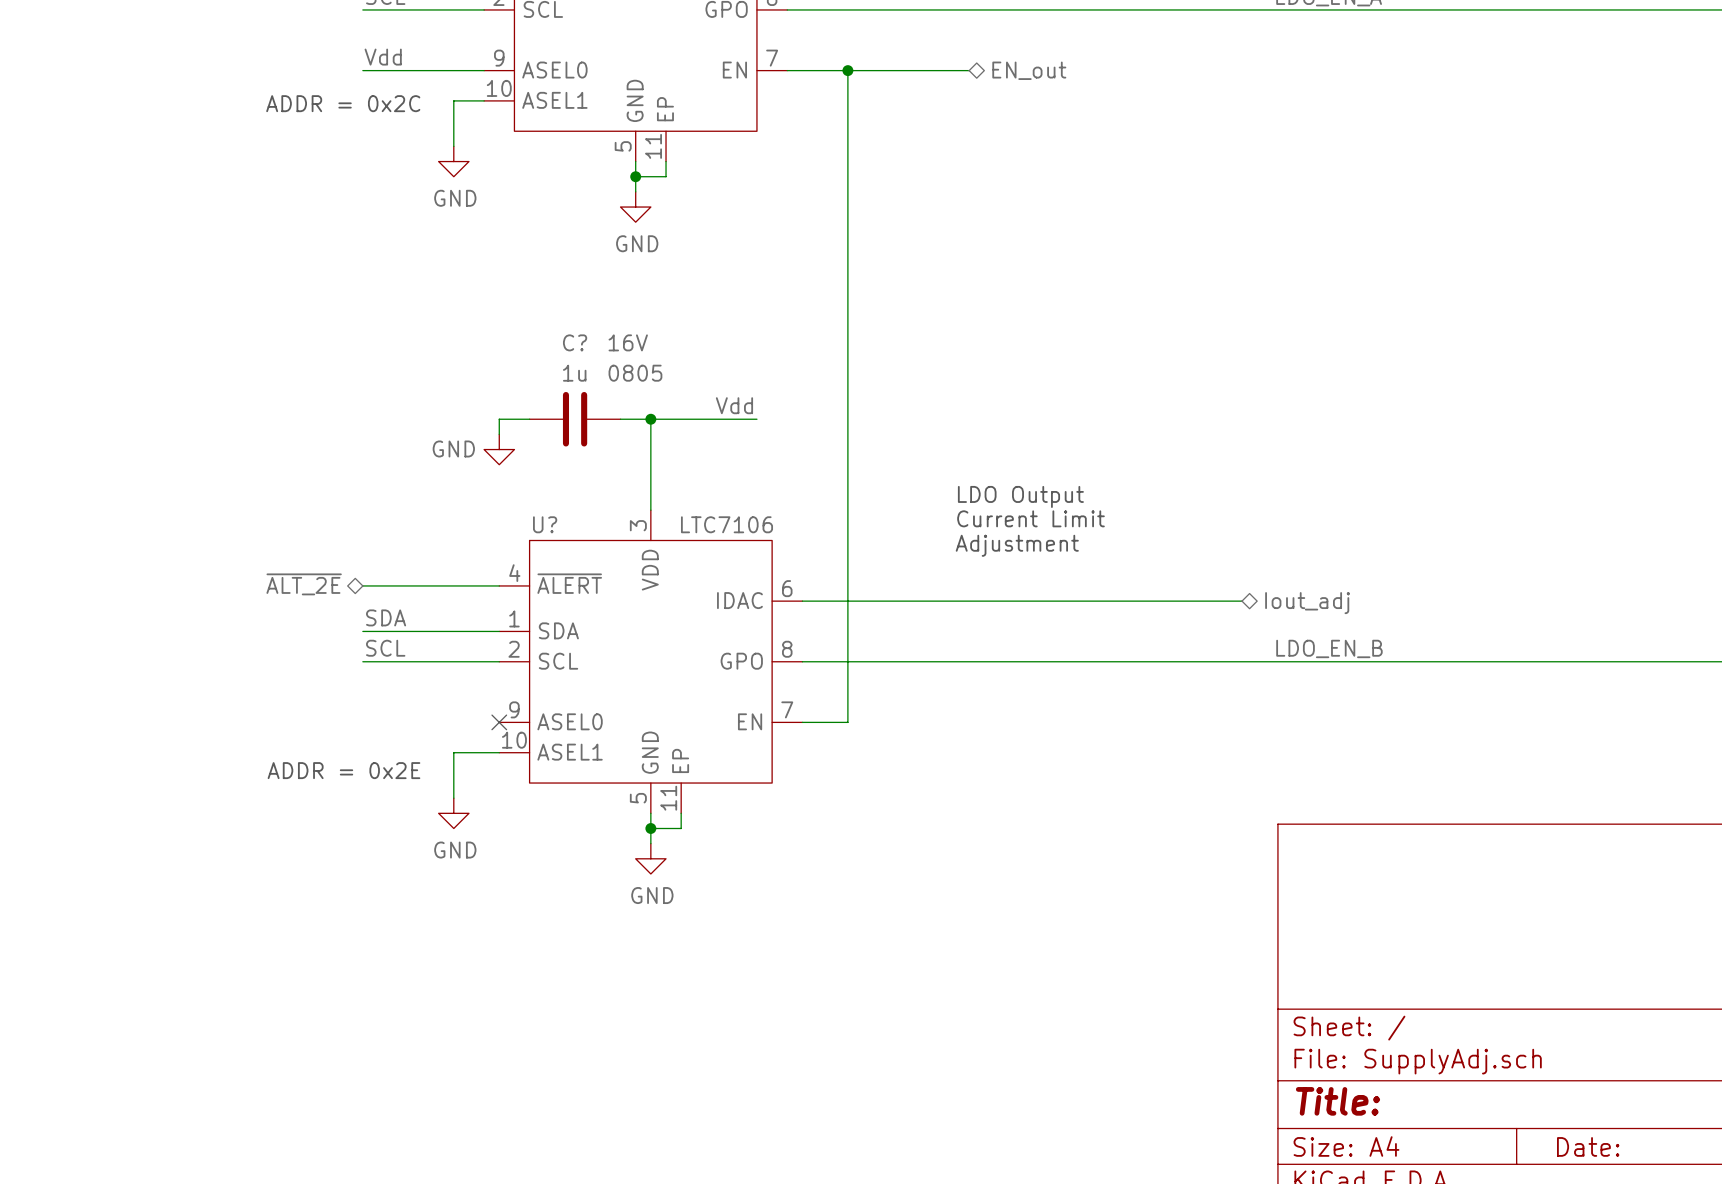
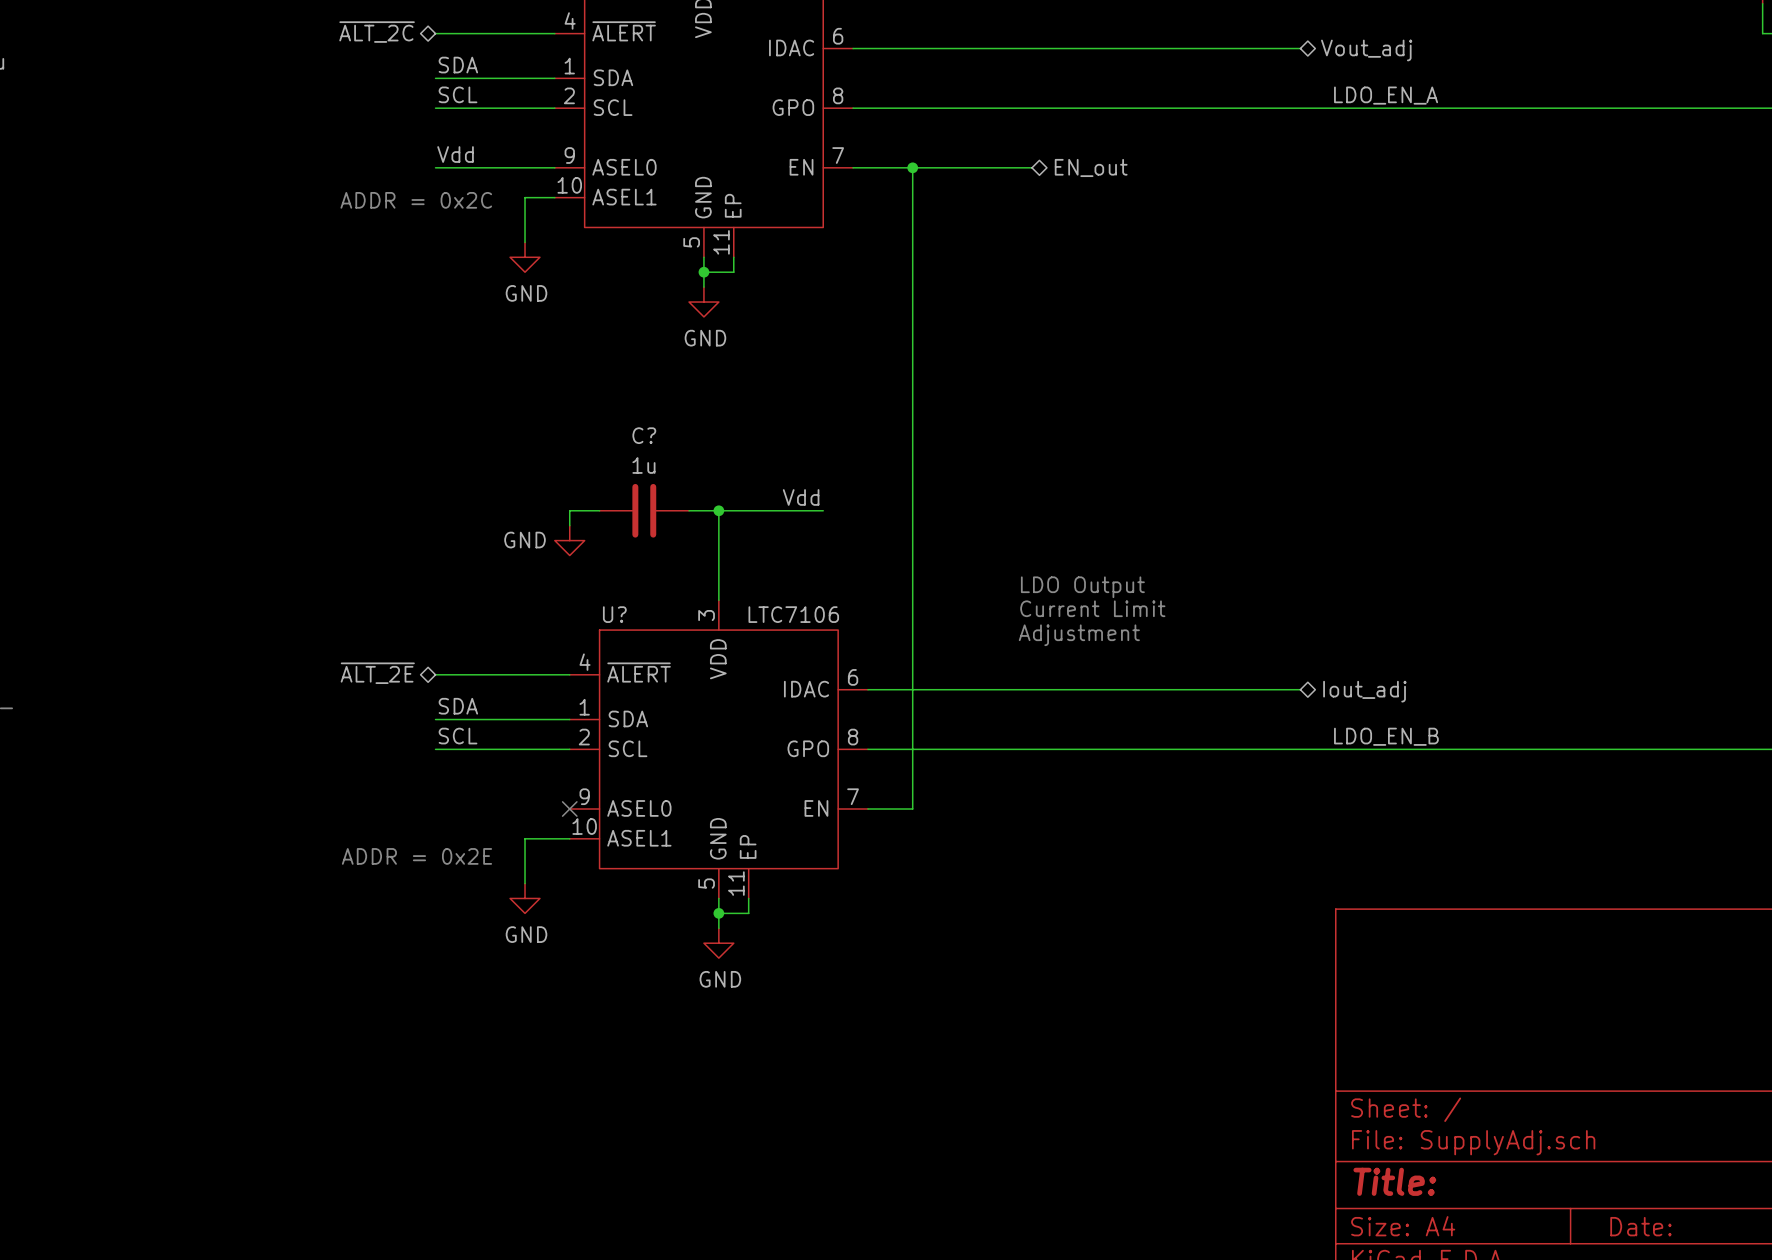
C? text: 16V (628, 342) -> none
C? text: 0805 (635, 373) -> none

